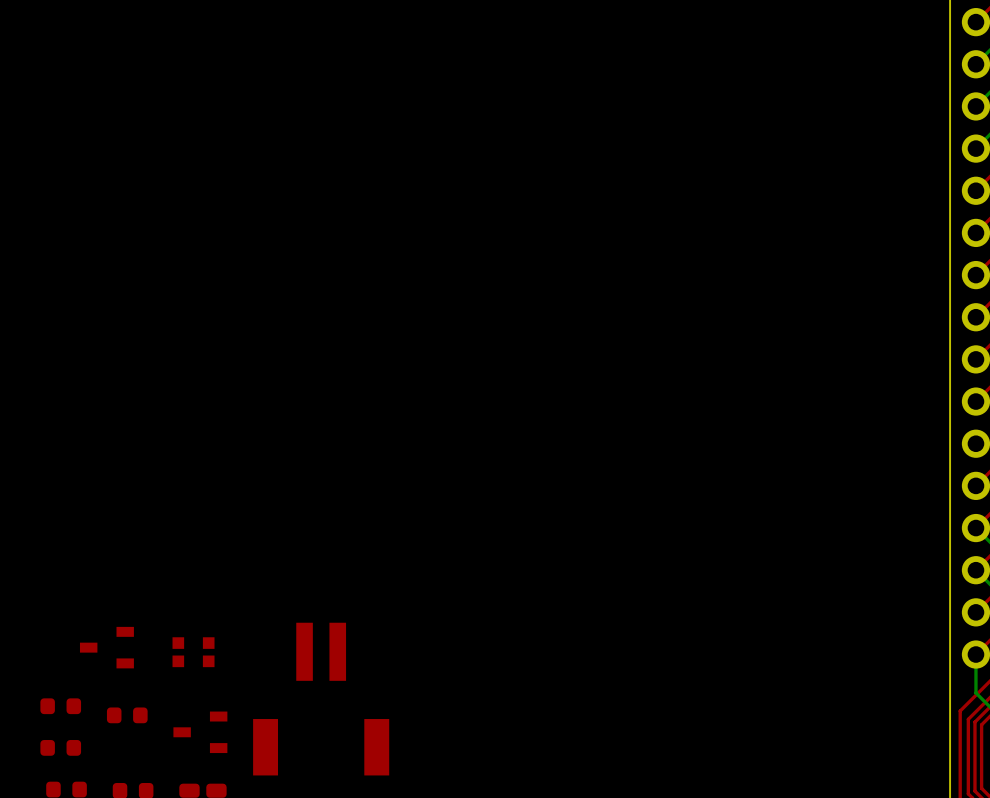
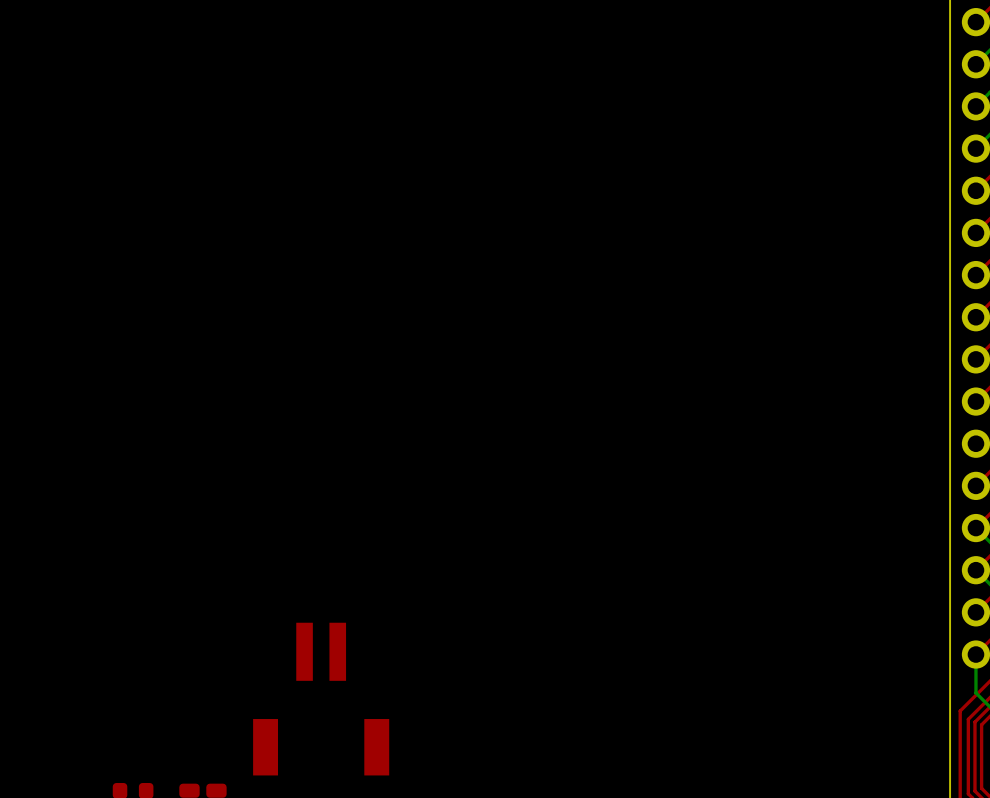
part: (106, 647) -> none
part: (193, 652) -> none
part: (60, 706) -> none
part: (127, 715) -> none
part: (200, 732) -> none
part: (60, 747) -> none
part: (66, 789) -> none

